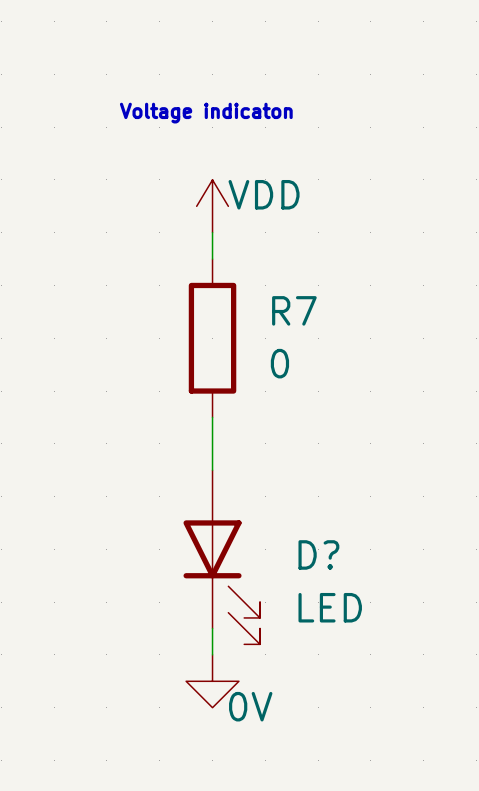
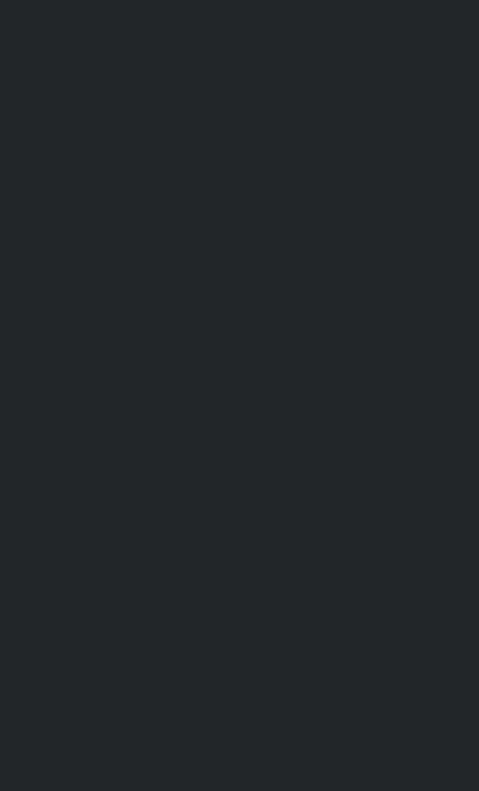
text: Voltage indicaton (206, 113) -> none
power symbol: VDD (212, 206) -> none
wire: (212, 232) (212, 259) -> none
R7: 0 (212, 338) -> none
wire: (212, 417) (212, 470) -> none
D?: LED (221, 557) -> none
wire: (212, 628) (212, 654) -> none
power symbol: 0V (212, 681) -> none

